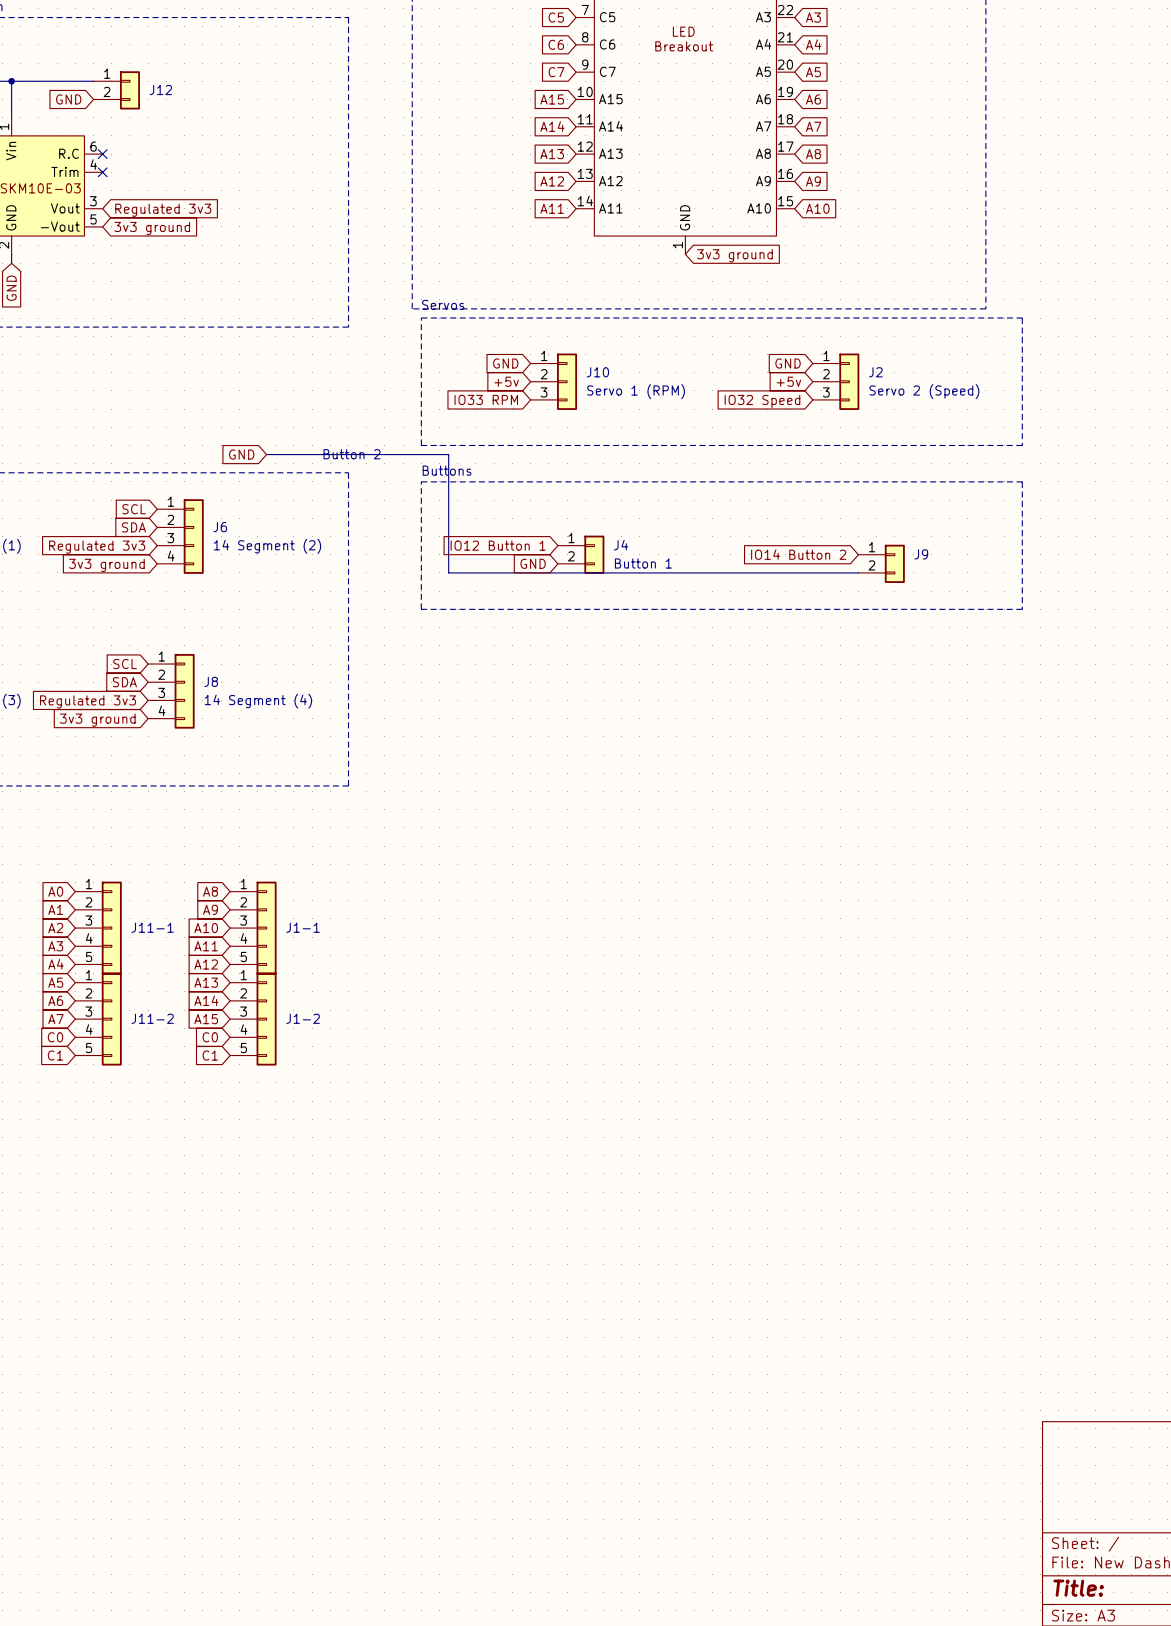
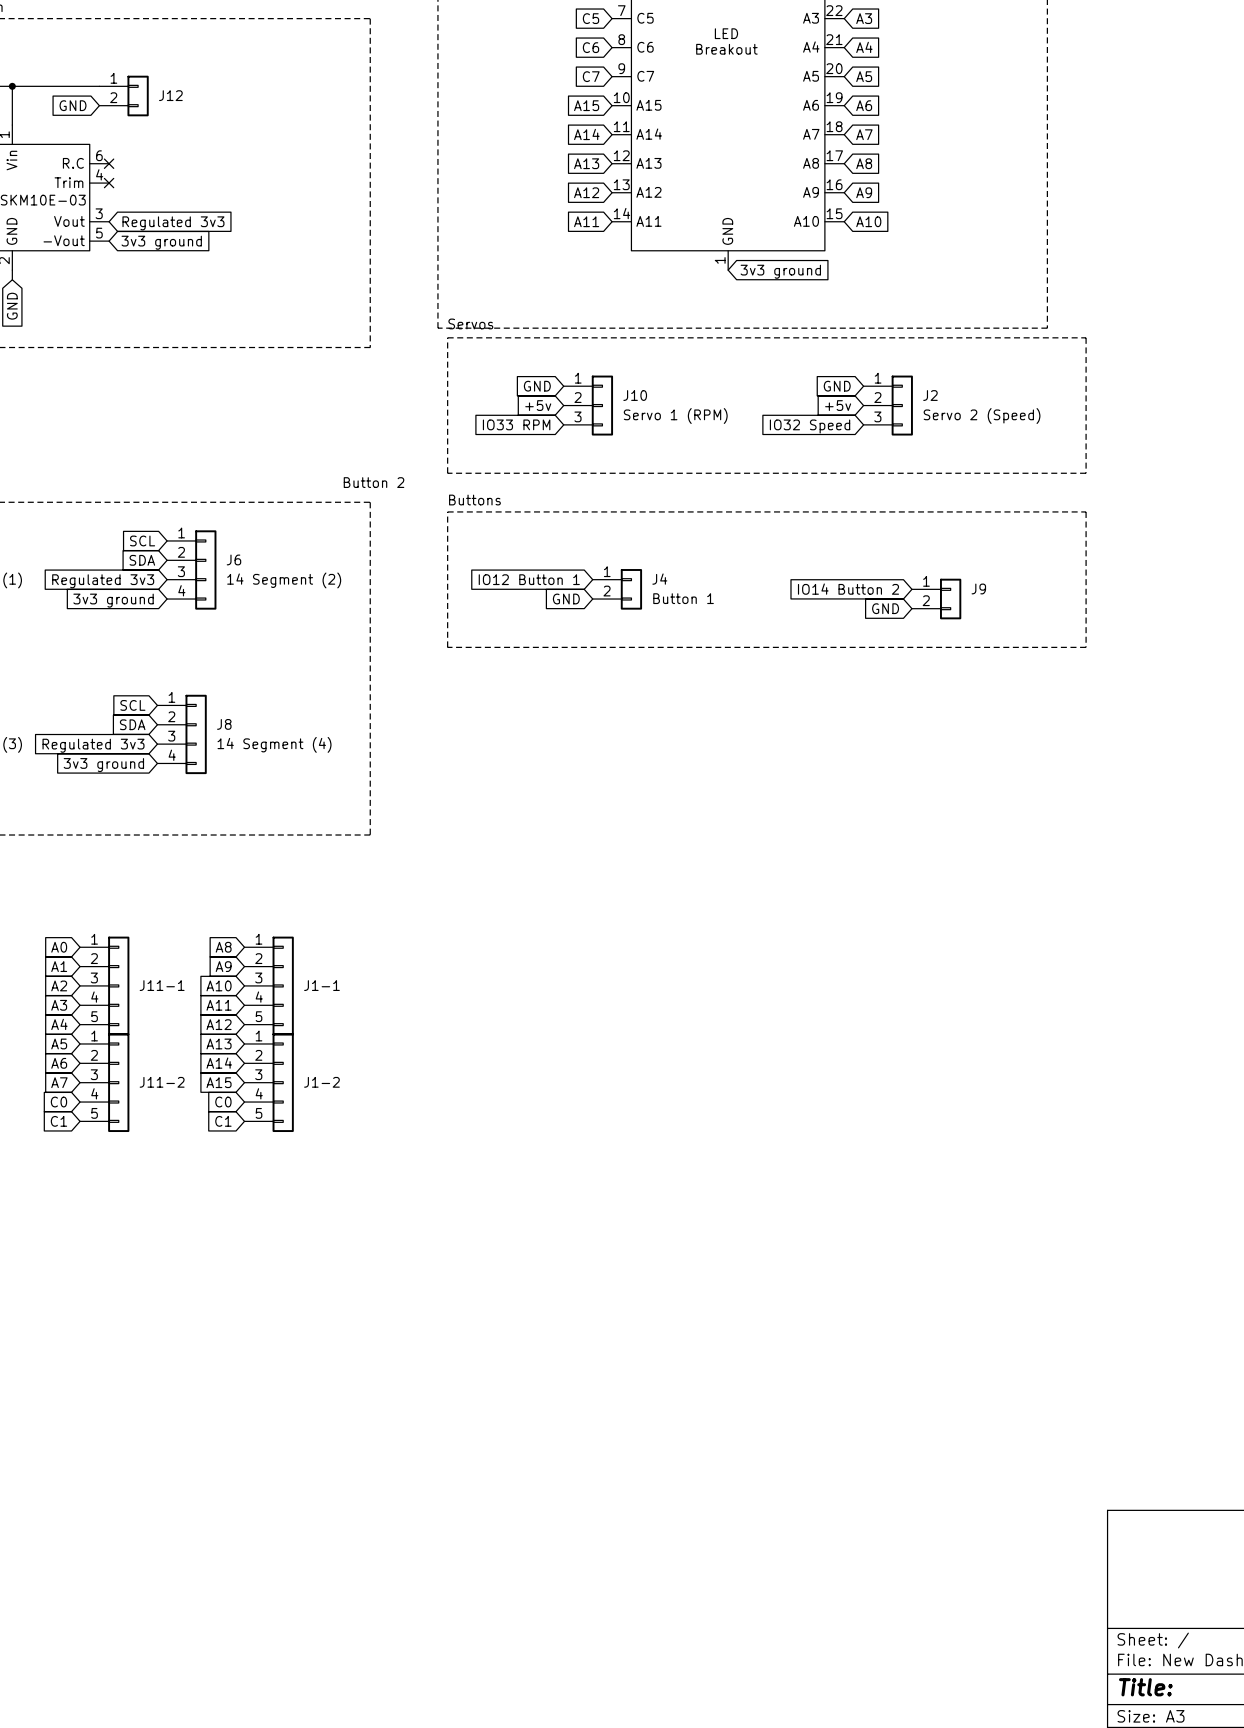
global label: GND (241, 454) -> none
wire: (266, 454) (448, 454) (448, 572) (858, 572) -> none
global label: none -> GND (885, 608)

